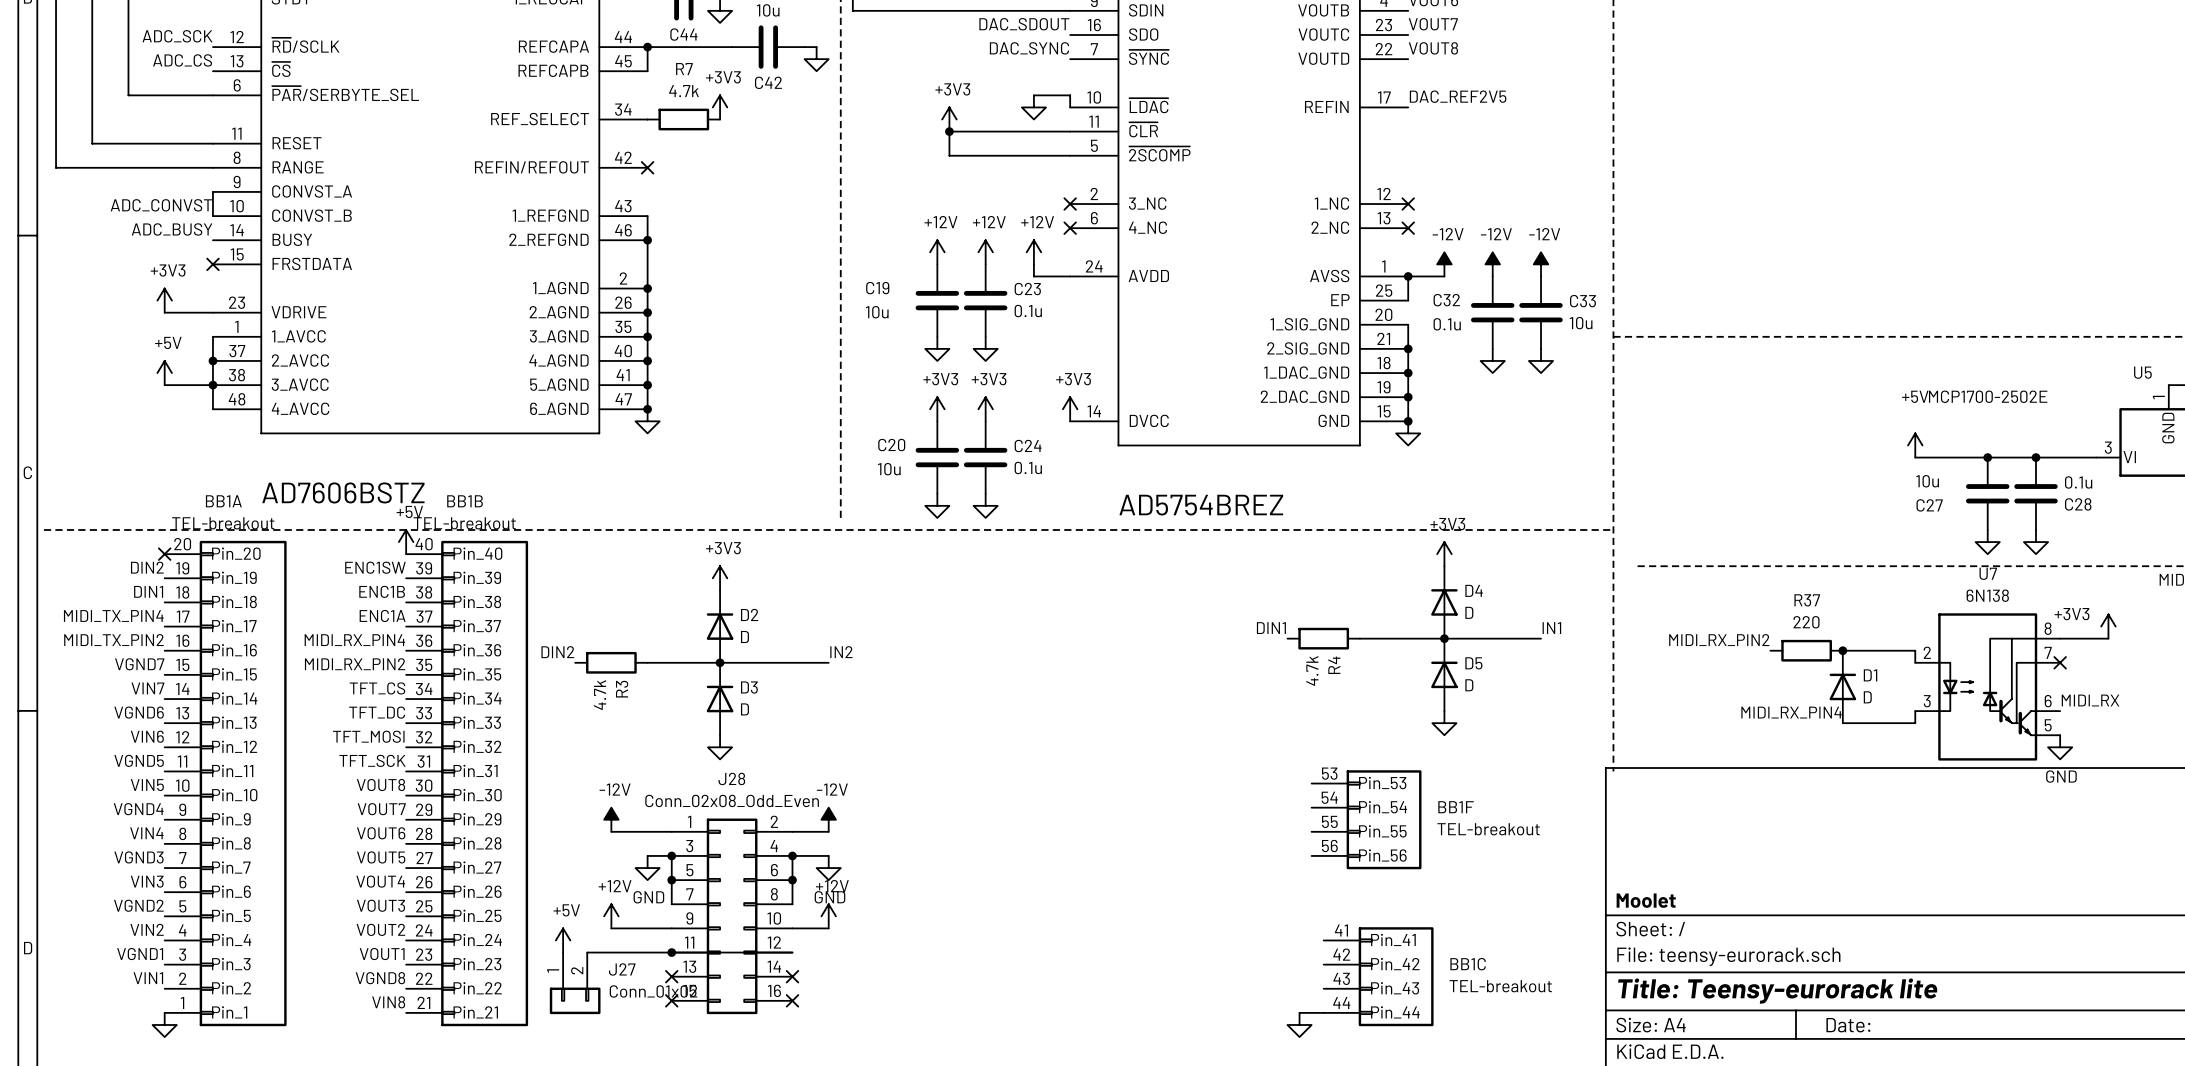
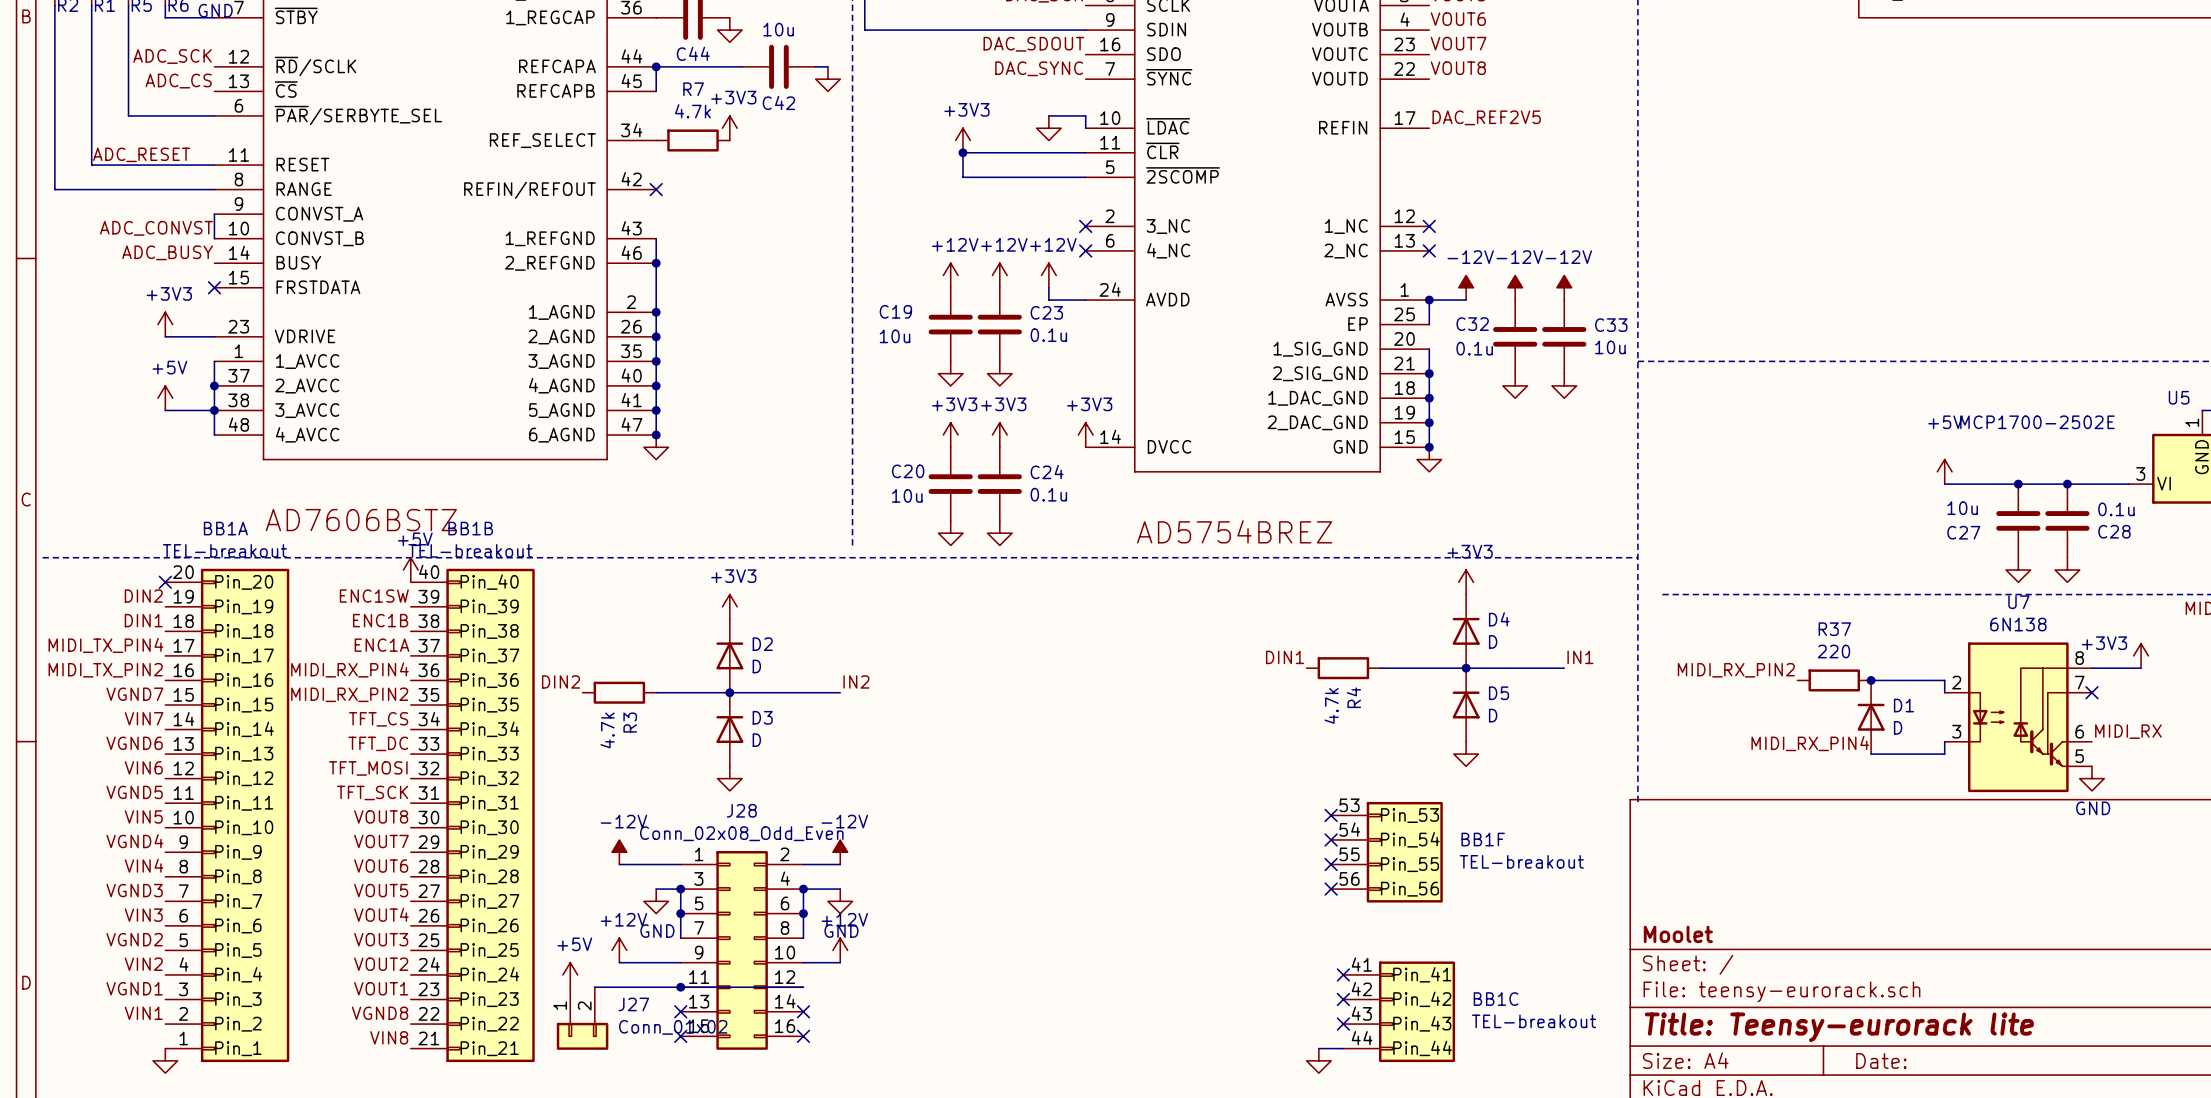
label: none -> ADC_RESET (141, 154)
no-connect mark: none -> (1331, 815)
no-connect mark: none -> (1331, 839)
no-connect mark: none -> (1331, 864)
no-connect mark: none -> (1331, 889)
no-connect mark: none -> (1343, 974)
no-connect mark: none -> (1343, 999)
no-connect mark: none -> (1343, 1024)

